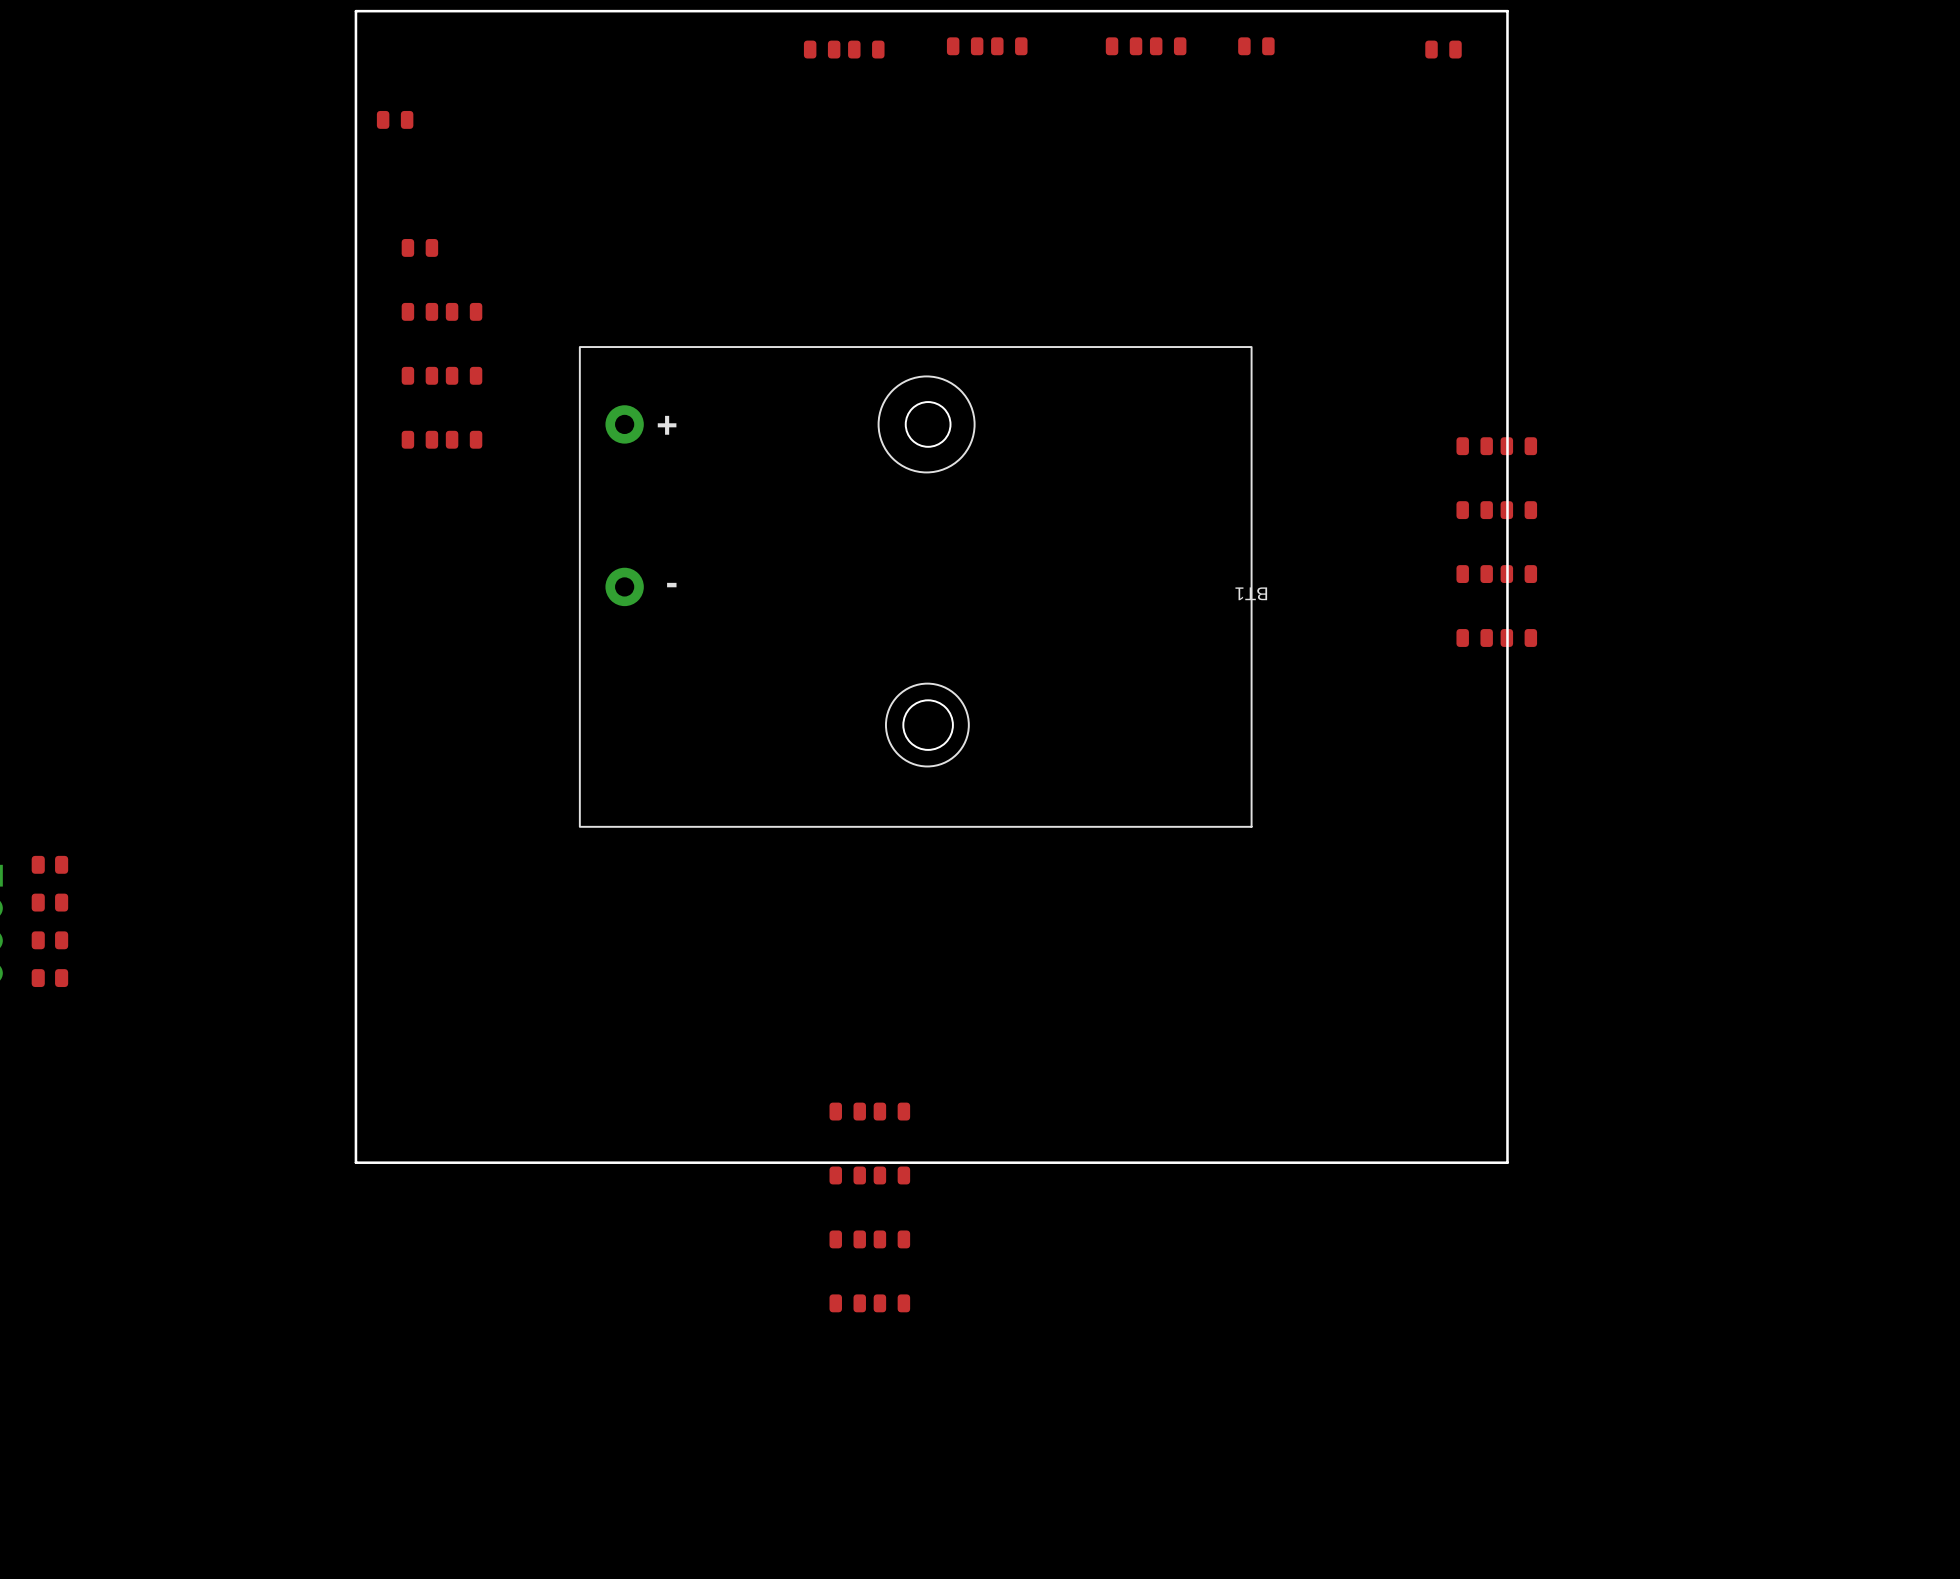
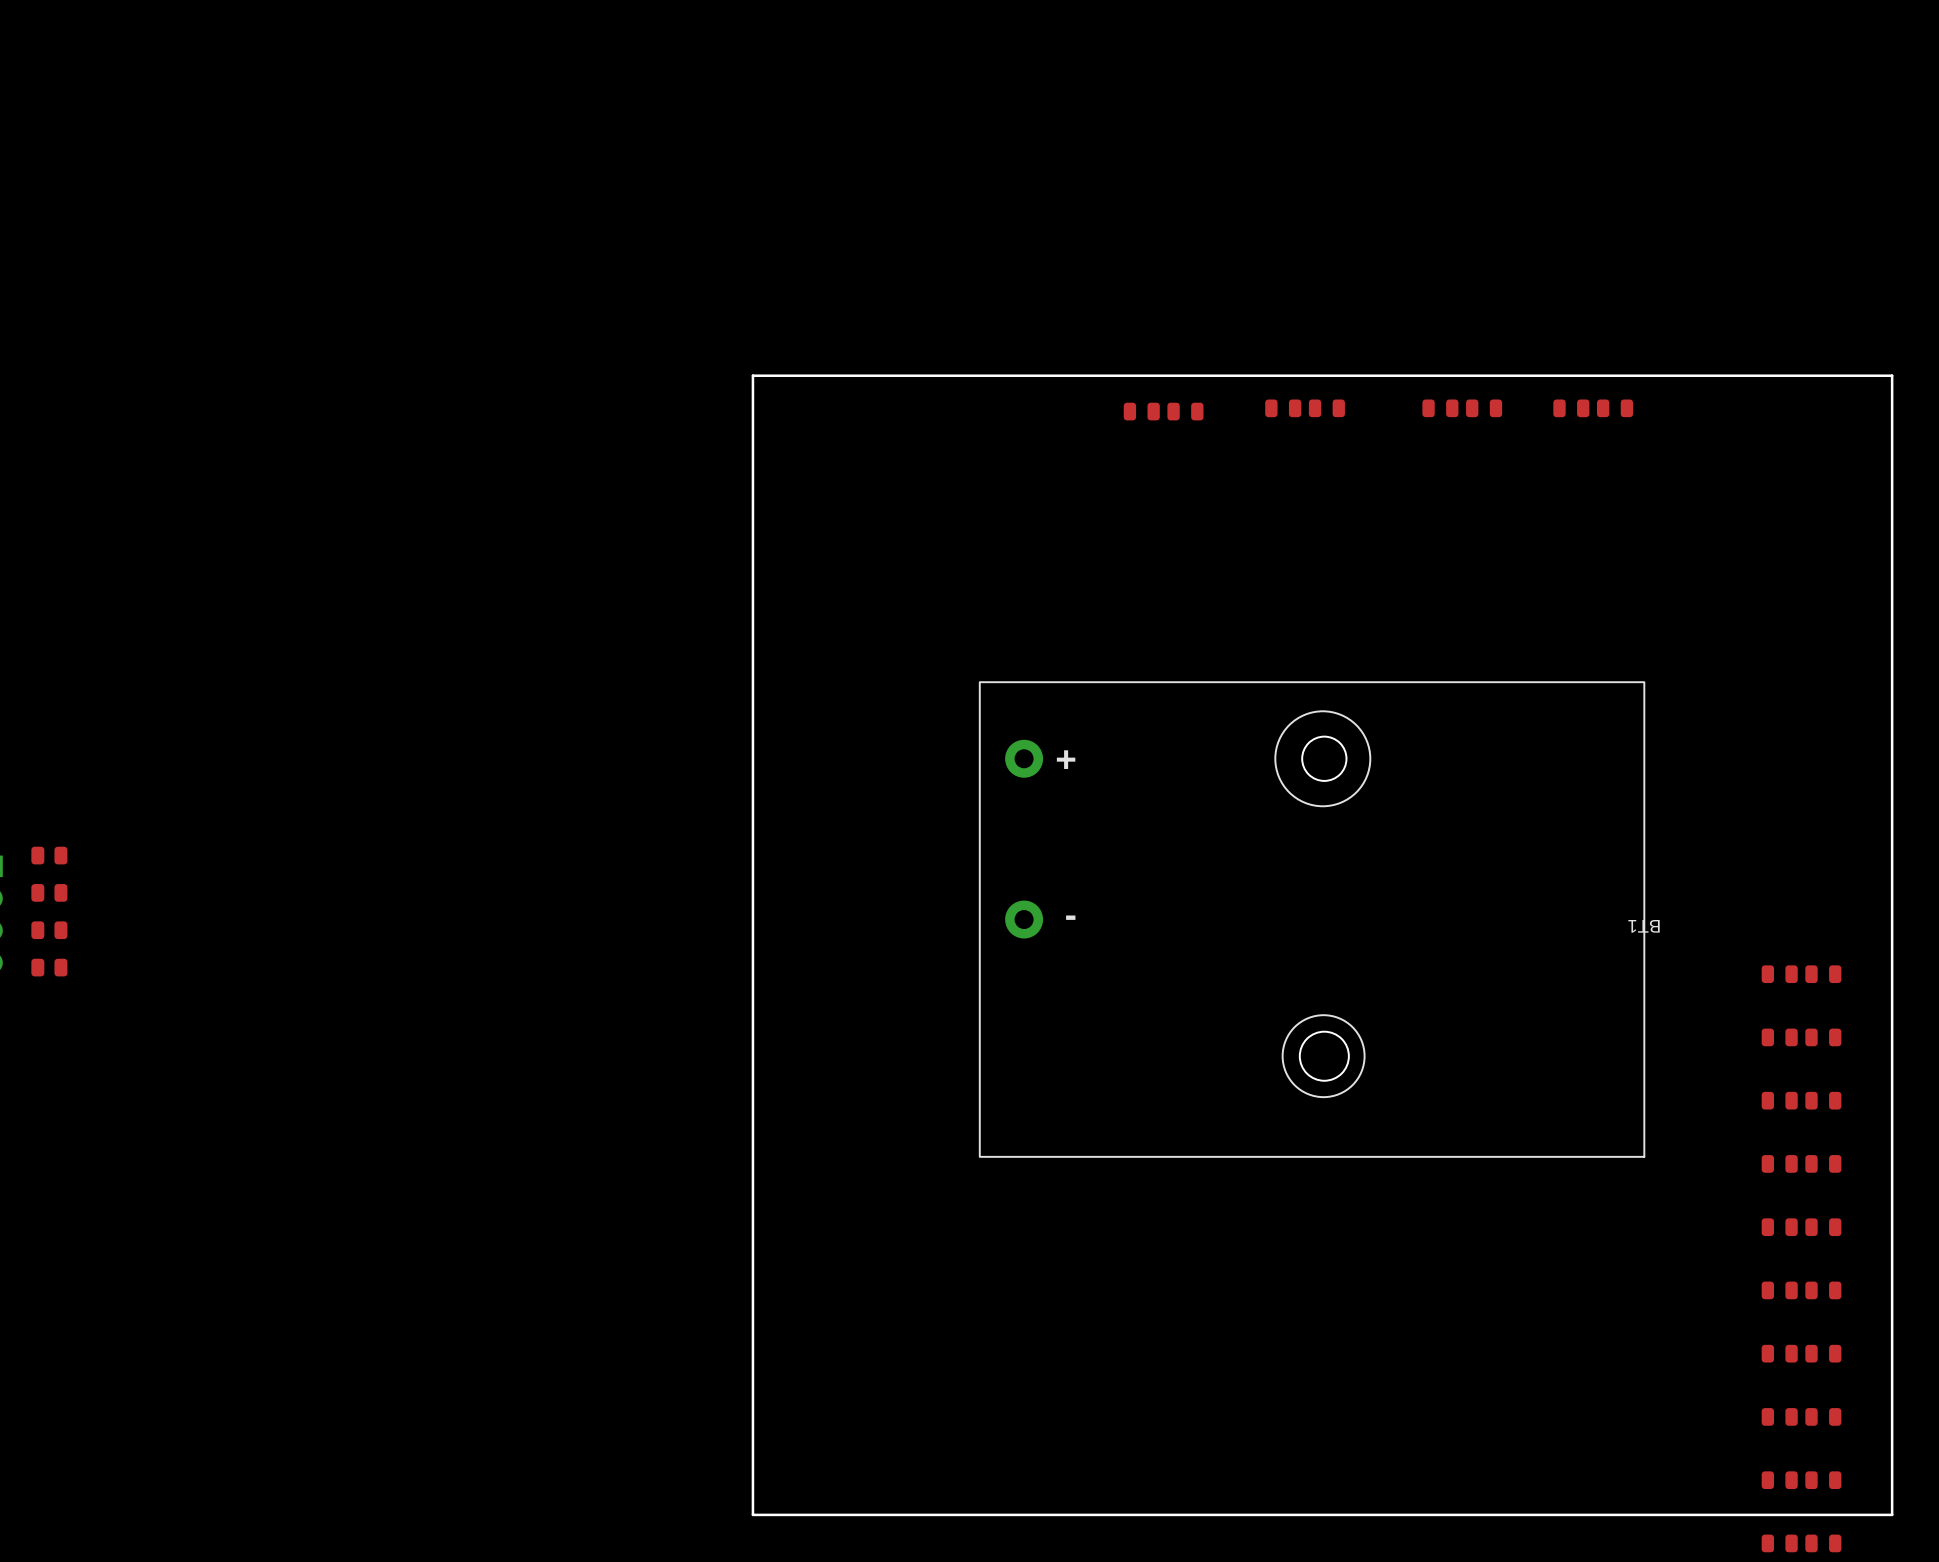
board edge: (1507, 11) (355, 11) (355, 1162) (1507, 1162) (1507, 11) -> none
part: (965, 46) -> none
part: (1009, 46) -> none
part: (1124, 46) -> none
part: (1168, 46) -> none
part: (1256, 46) -> none
part: (822, 49) -> none
part: (866, 49) -> none
part: (1443, 49) -> none
part: (395, 119) -> none
part: (419, 247) -> none
part: (419, 311) -> none
part: (464, 311) -> none
part: (419, 375) -> none
part: (464, 375) -> none
board edge: none -> (1892, 375) (752, 375) (752, 1514) (1892, 1514) (1892, 375)
part: none -> (1283, 408)
part: none -> (1326, 408)
part: none -> (1440, 408)
part: none -> (1484, 408)
part: none -> (1571, 408)
part: none -> (1615, 408)
part: none -> (1141, 411)
part: none -> (1185, 411)
part: (419, 439) -> none
part: (464, 439) -> none
part: (1474, 446) -> none
part: (1518, 446) -> none
part: (1474, 510) -> none
part: (1518, 510) -> none
part: (1474, 574) -> none
part: (1518, 574) -> none
BT1 position: (915, 586) -> (1312, 919)
part: (1474, 637) -> none
part: (1518, 637) -> none
part: none -> (1779, 974)
part: none -> (1823, 974)
part: none -> (1779, 1037)
part: none -> (1823, 1037)
part: (847, 1111) -> none
part: (891, 1111) -> none
part: none -> (1779, 1100)
part: none -> (1823, 1100)
part: (847, 1175) -> none
part: (891, 1175) -> none
part: none -> (1779, 1163)
part: none -> (1823, 1163)
part: (847, 1239) -> none
part: (891, 1239) -> none
part: none -> (1779, 1227)
part: none -> (1823, 1227)
part: (847, 1303) -> none
part: (891, 1303) -> none
part: none -> (1779, 1290)
part: none -> (1823, 1290)
part: none -> (1779, 1353)
part: none -> (1823, 1353)
part: none -> (1779, 1416)
part: none -> (1823, 1416)
part: none -> (1779, 1480)
part: none -> (1823, 1480)
part: none -> (1779, 1543)
part: none -> (1823, 1543)

